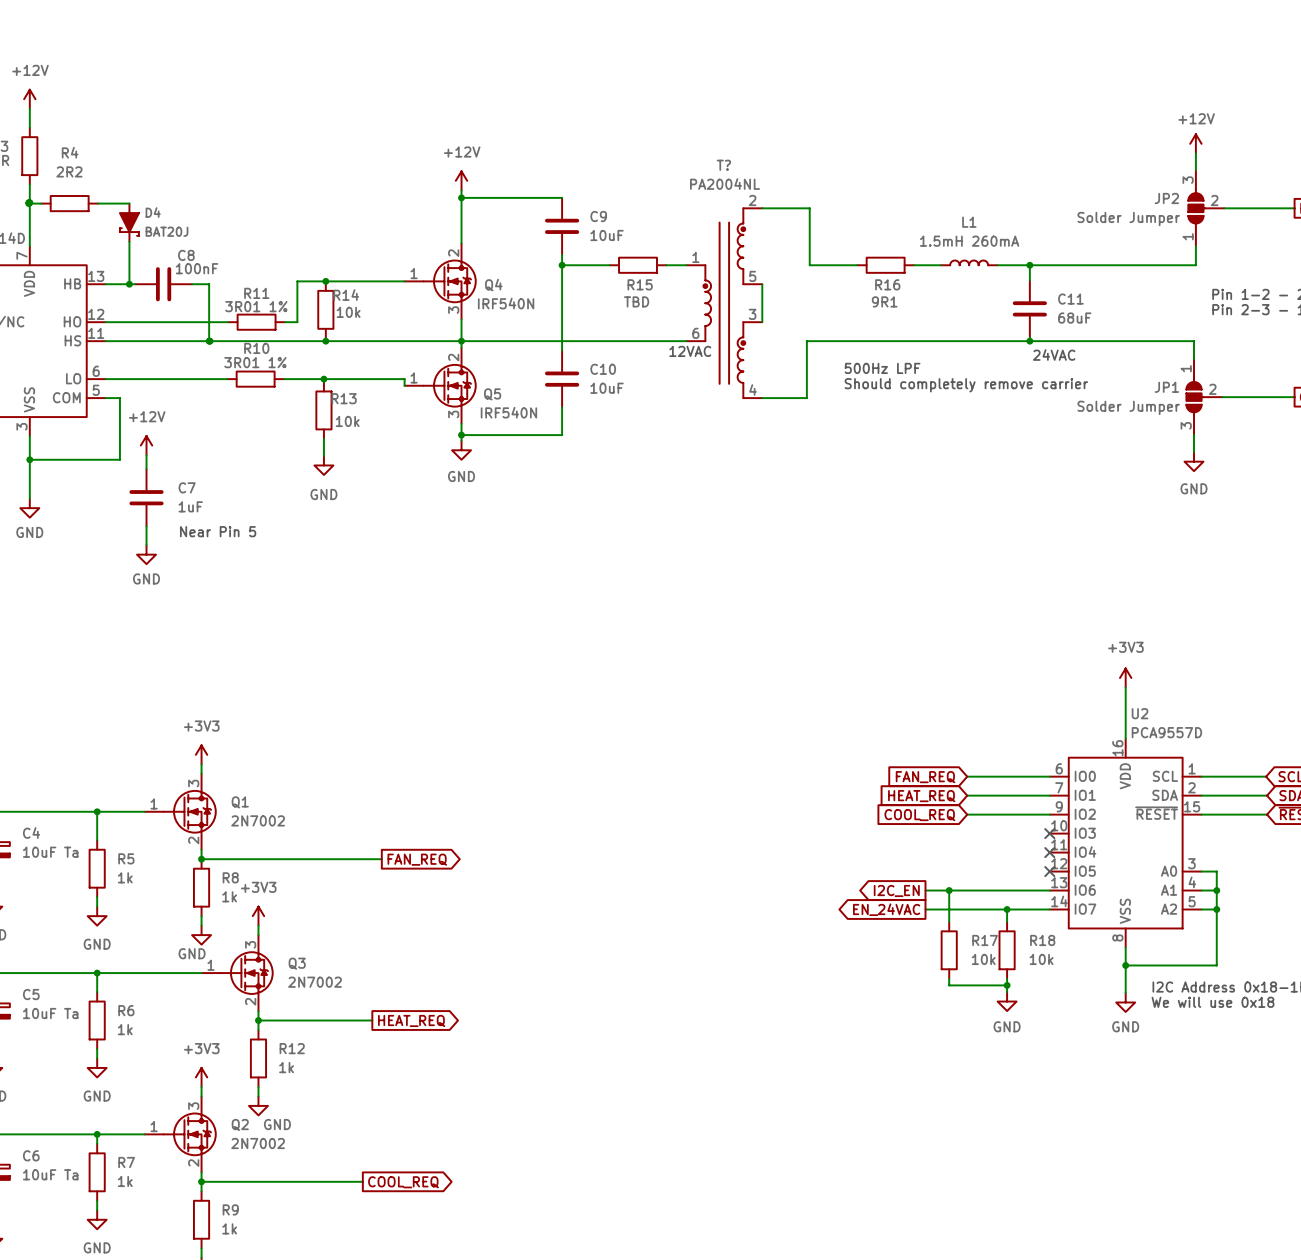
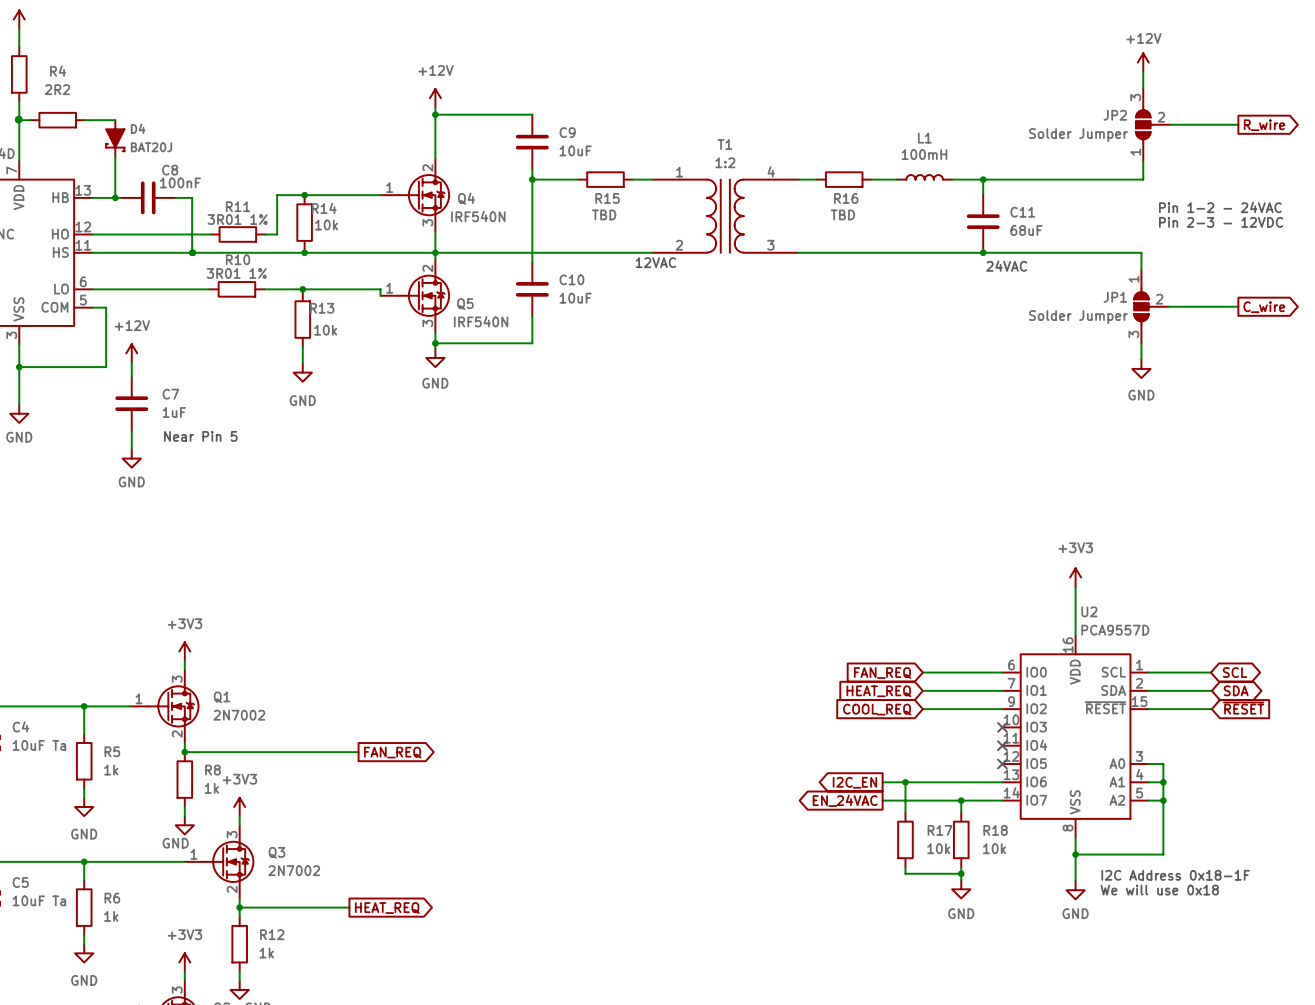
wire: (762, 208) (809, 208) (809, 265) (838, 265) -> none
L1 value: 1.5mH 260mA (969, 241) -> 100mH (924, 154)
wire: (762, 284) (762, 322) -> none
R16 value: 9R1 (884, 301) -> TBD (842, 214)
T?: PA2004NL (724, 303) -> none
T1: none -> 1:2 (725, 216)
wire: (838, 341) (806, 341) (806, 398) (762, 398) -> none
text: 500Hz LPF (882, 368) -> none
text: Should completely remove carrier (966, 385) -> none

